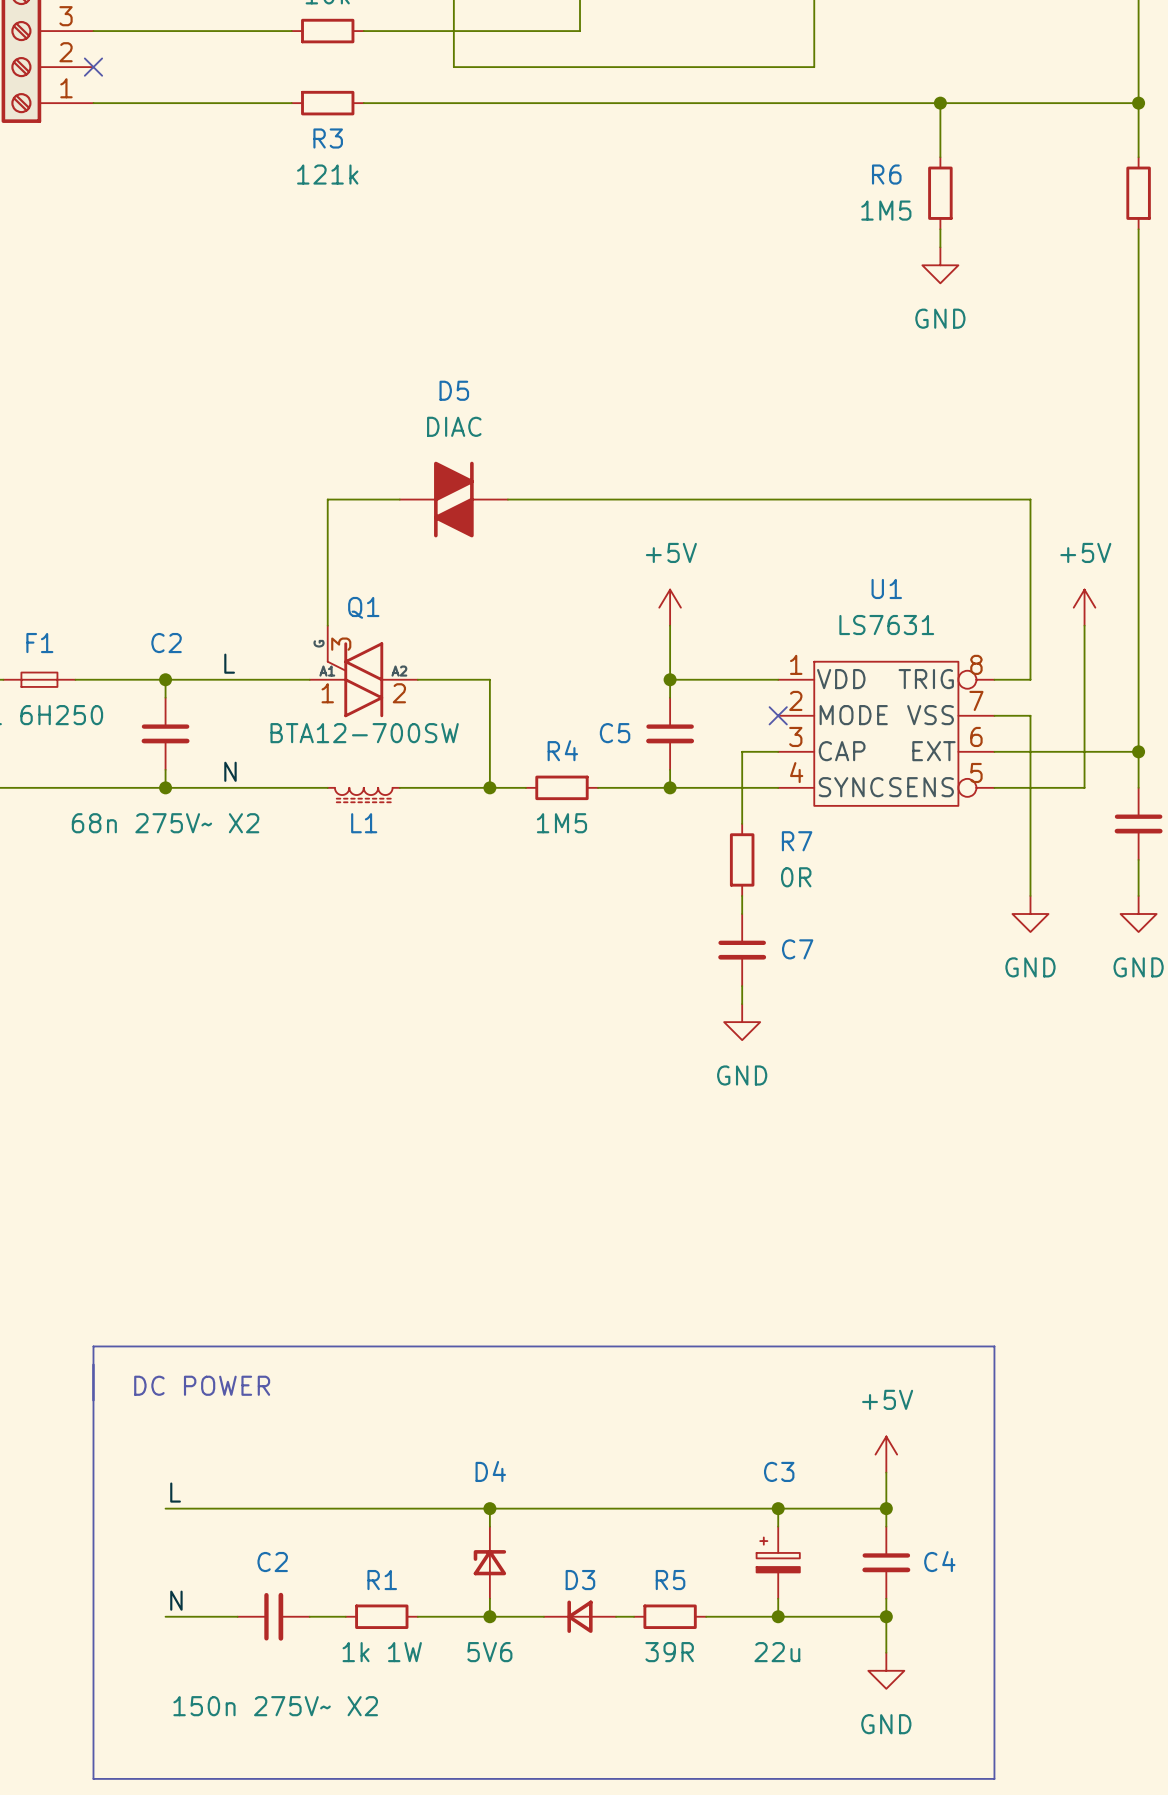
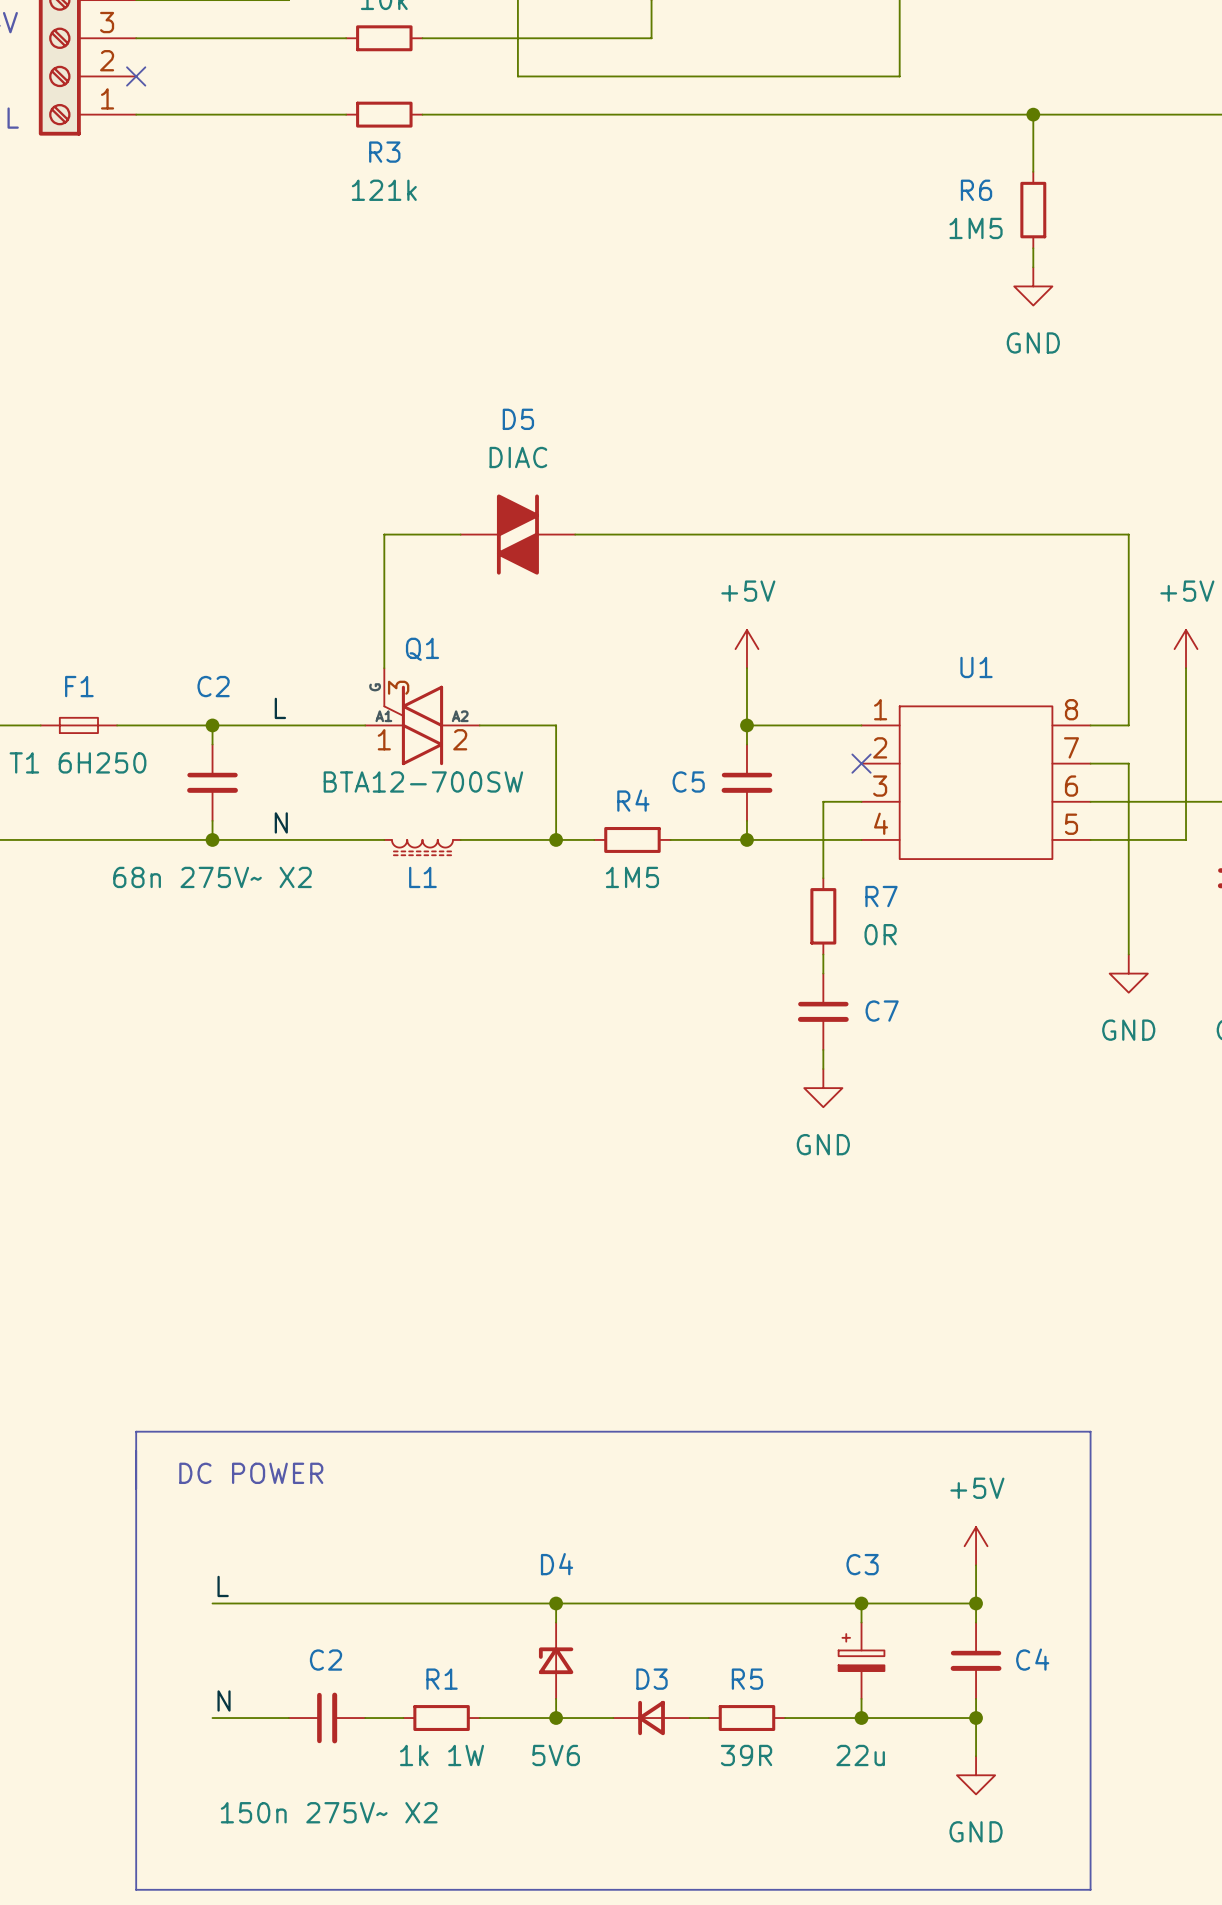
U1 name position: U1 (886, 588) -> U1 (976, 667)
U1 value: LS7631 (886, 625) -> none
U1 symbol: [778, 661, 995, 806] -> [861, 706, 1091, 860]

